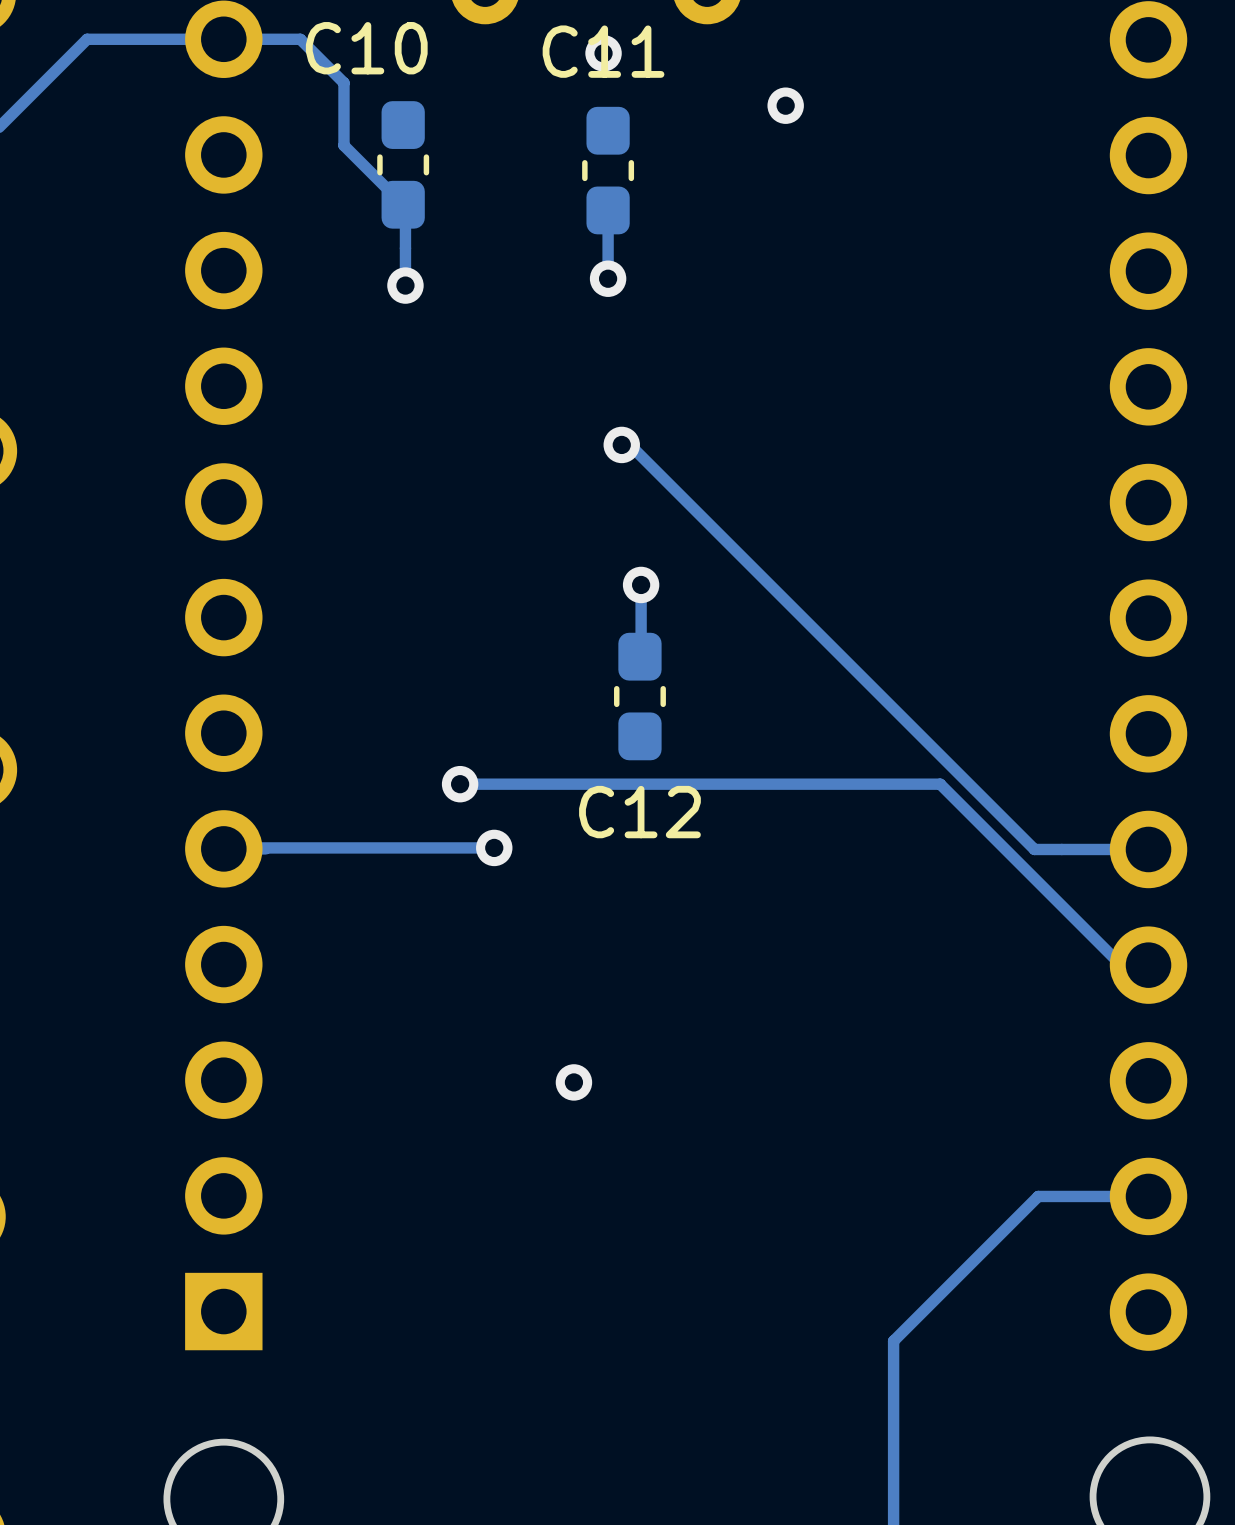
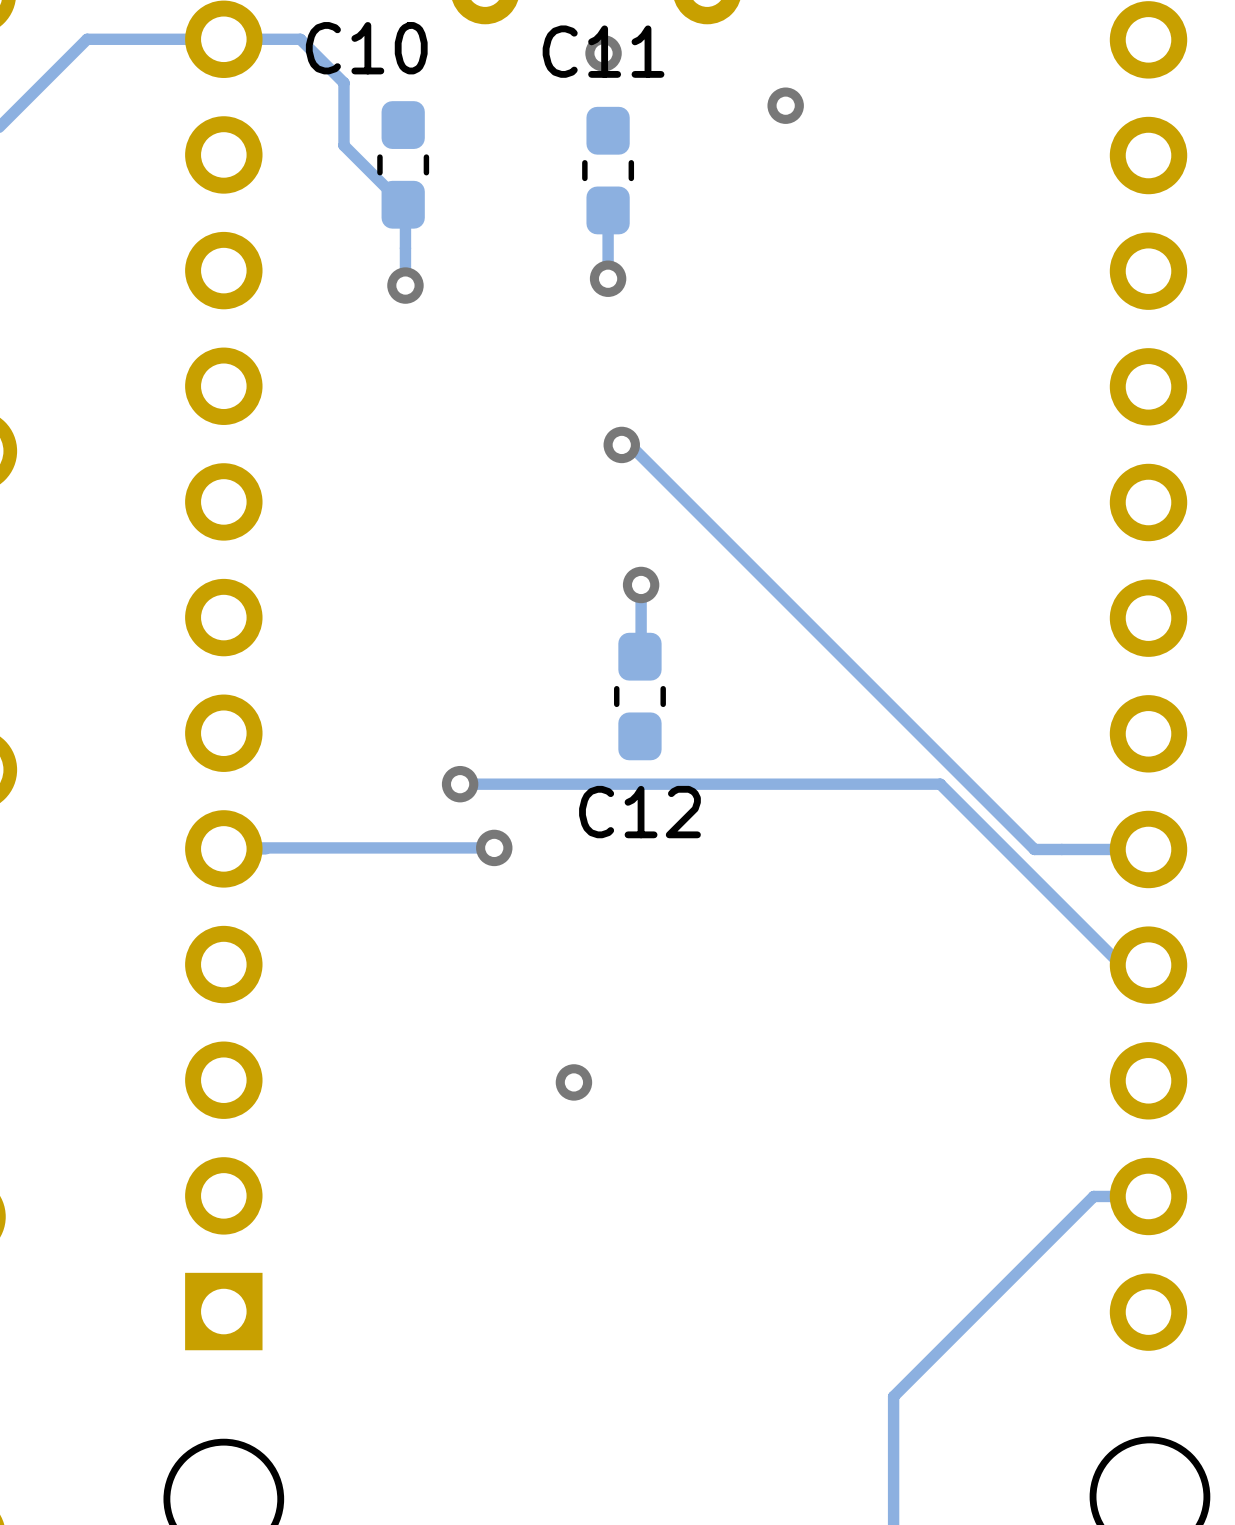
track: (1093, 1196) (1038, 1196) (893, 1341) (893, 1396) -> (1093, 1196) (893, 1396)

